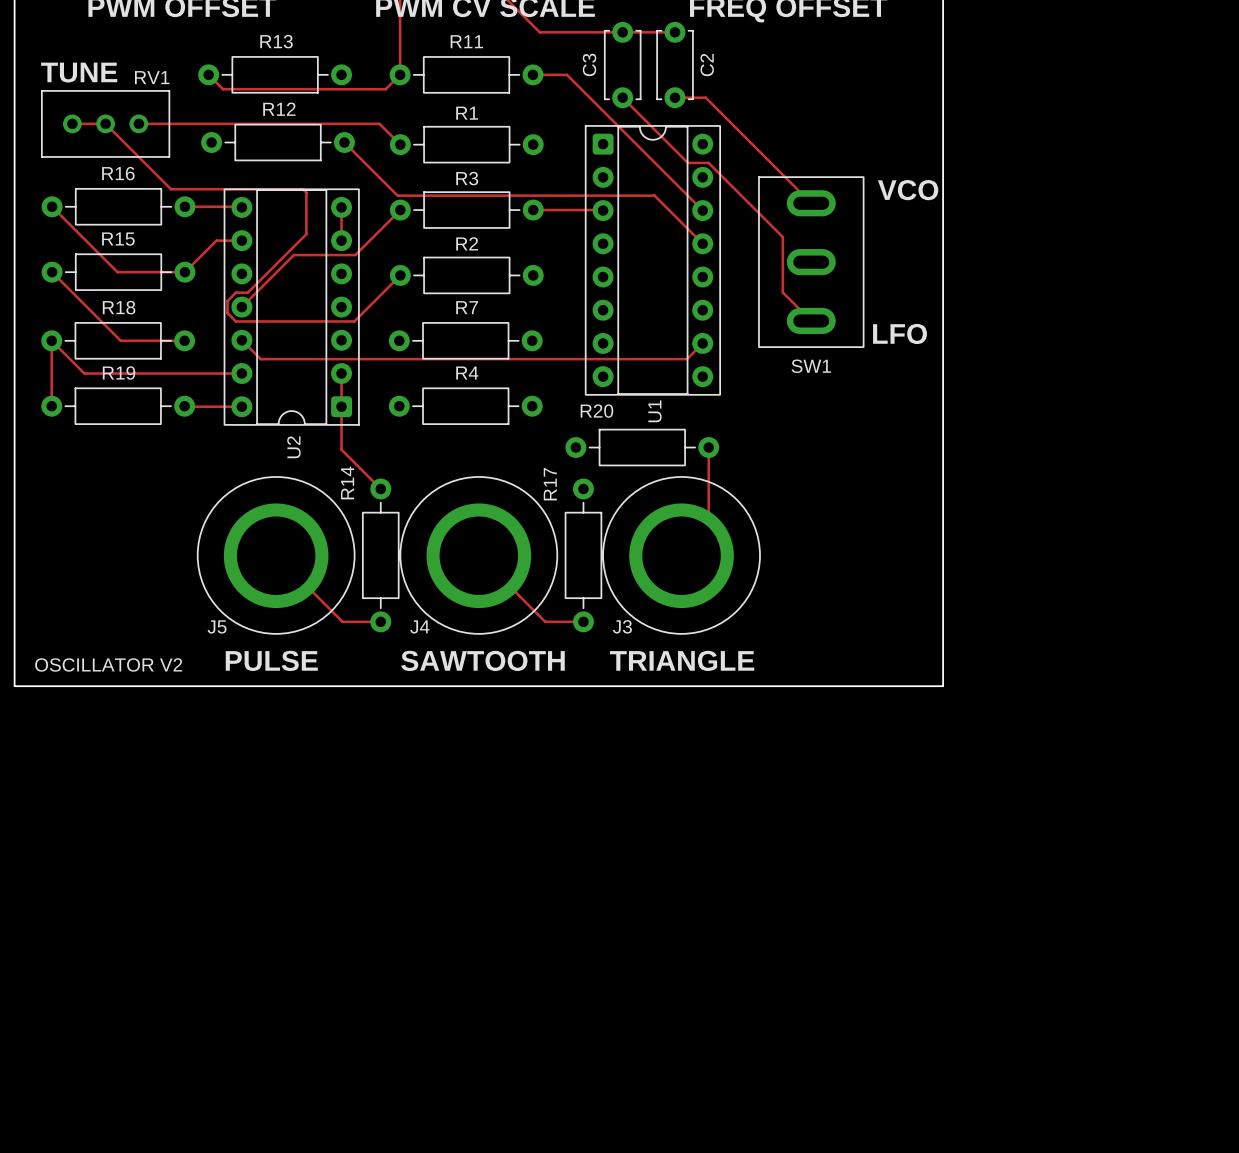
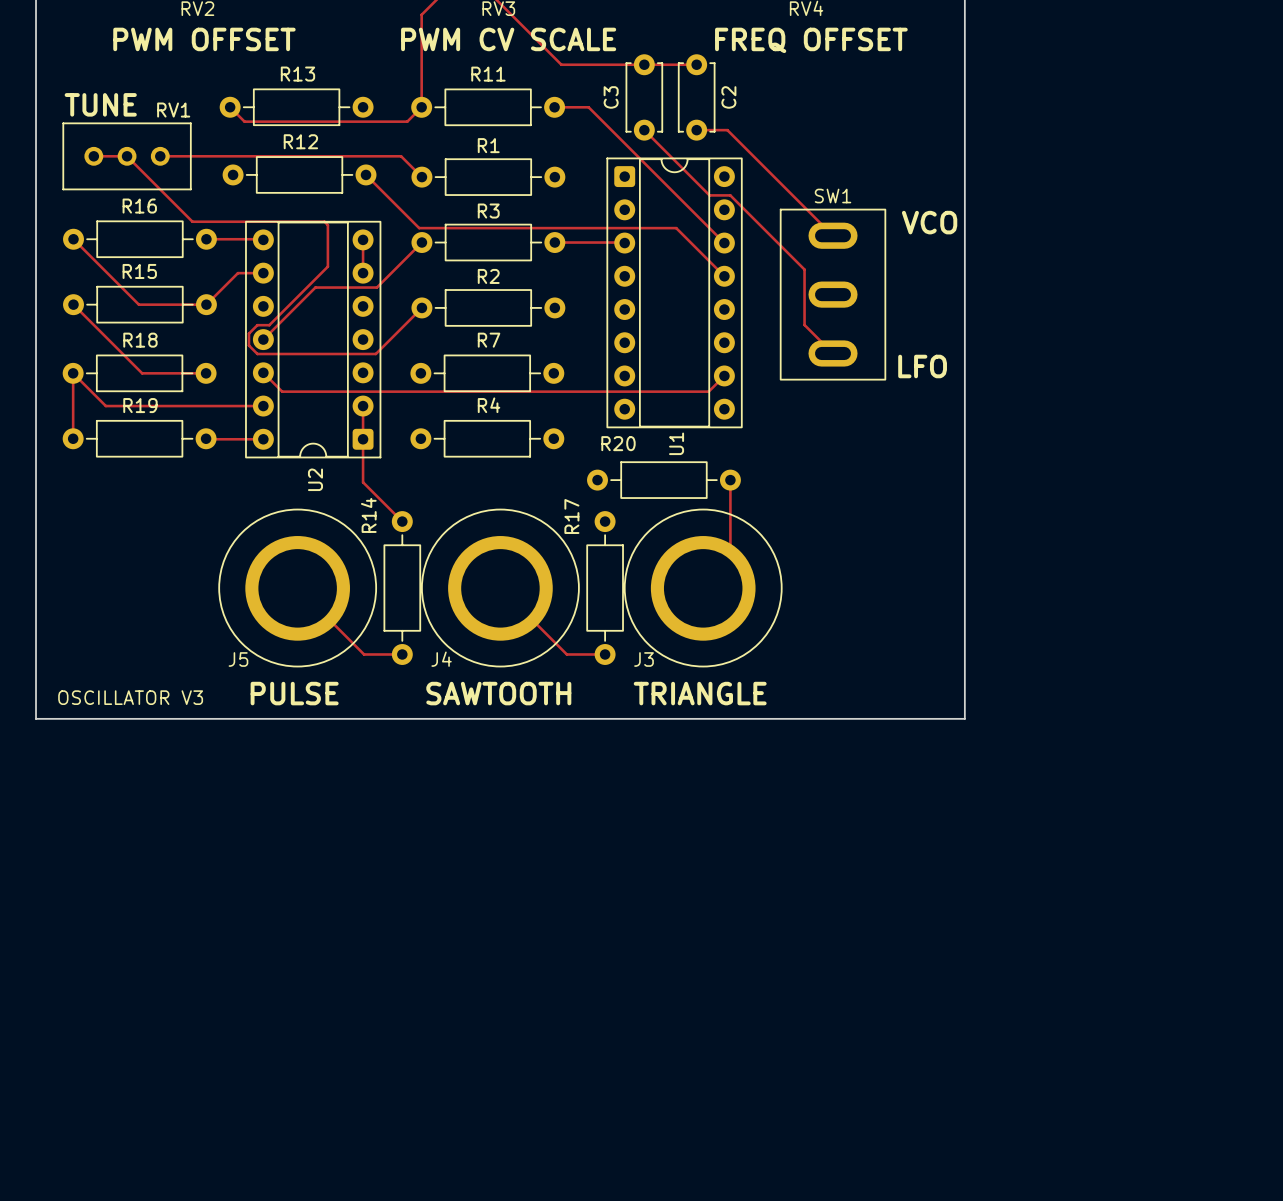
SW1 name position: SW1 (811, 366) -> SW1 (833, 196)
text: OSCILLATOR V2 (108, 664) -> OSCILLATOR V3 (130, 697)

